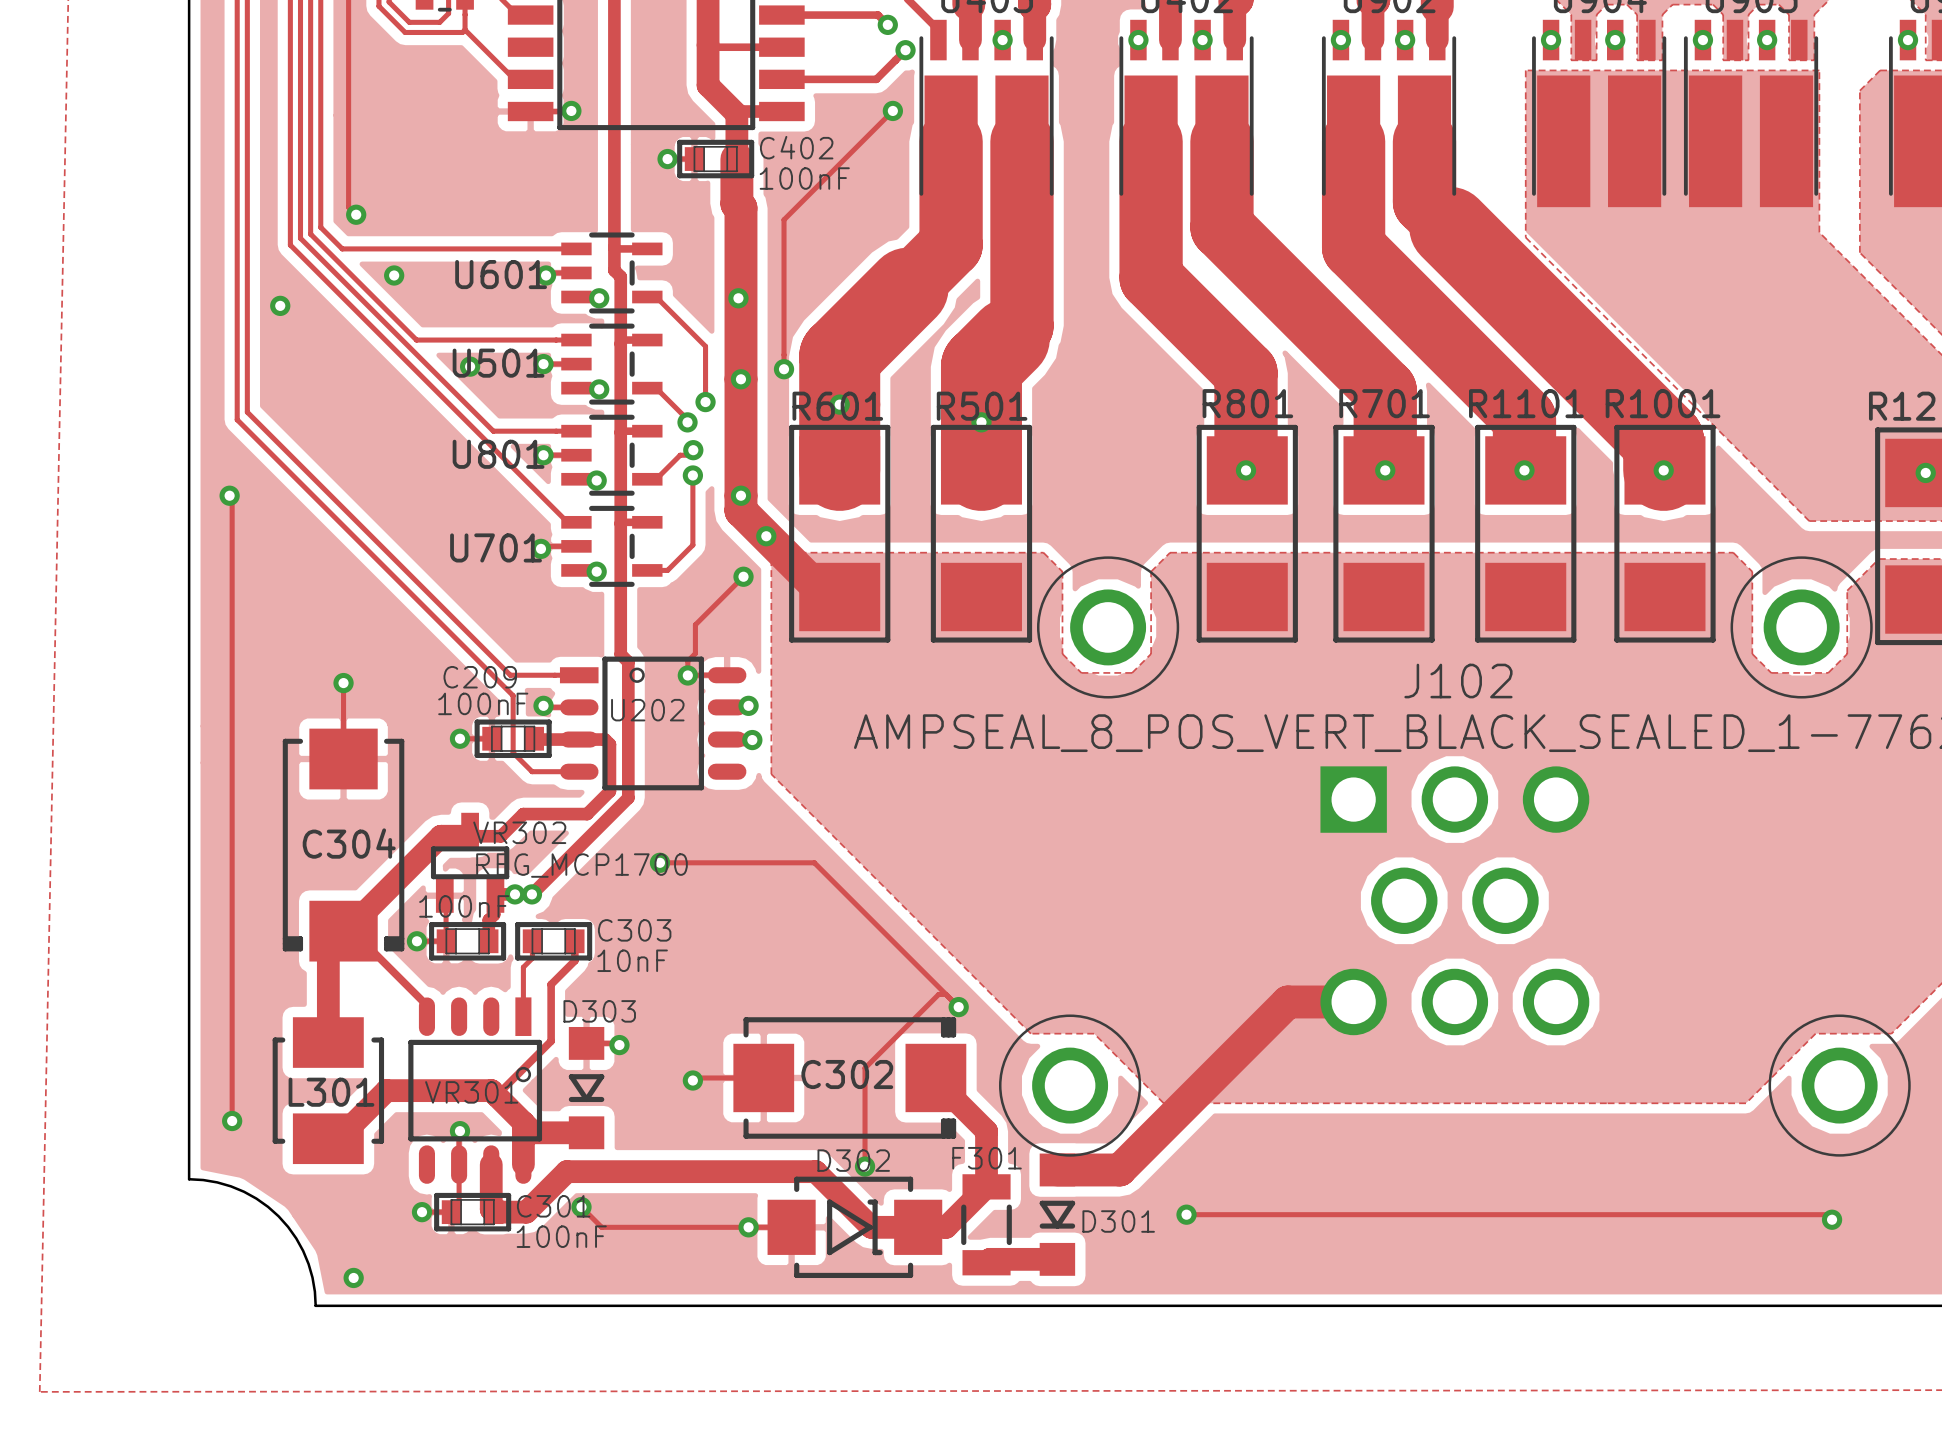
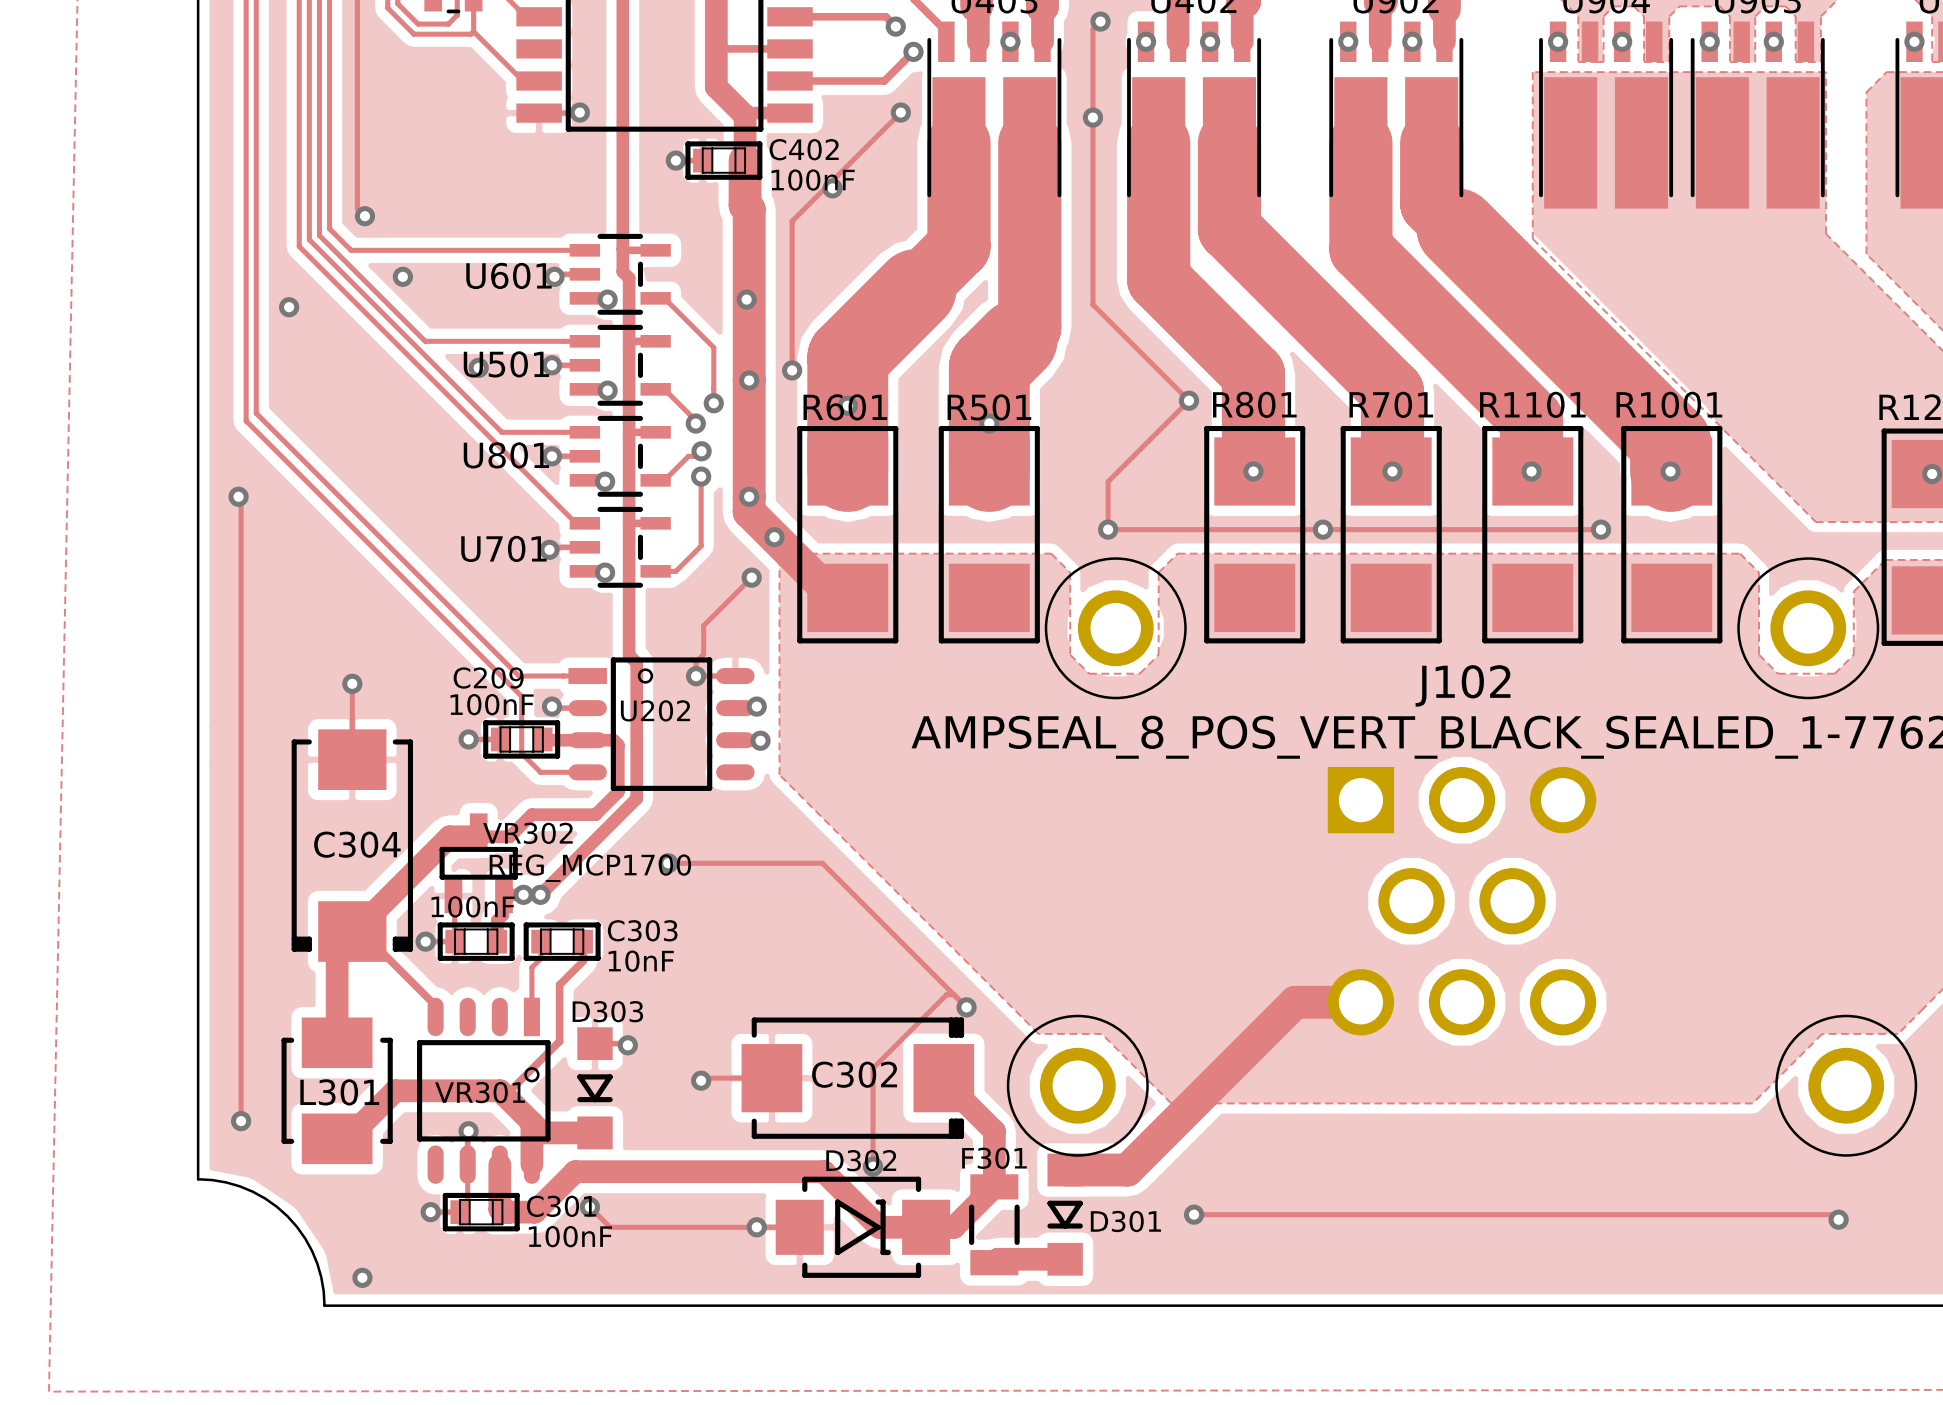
track: none -> (1100, 21) (1092, 29) (1092, 304) (1189, 400) (1108, 481) (1108, 529) (1601, 529)
via: none -> (1100, 21)
via: none -> (1092, 117)
via: none -> (832, 188)
via: none -> (1189, 400)
via: none -> (1108, 529)
via: none -> (1322, 529)
via: none -> (1601, 529)

